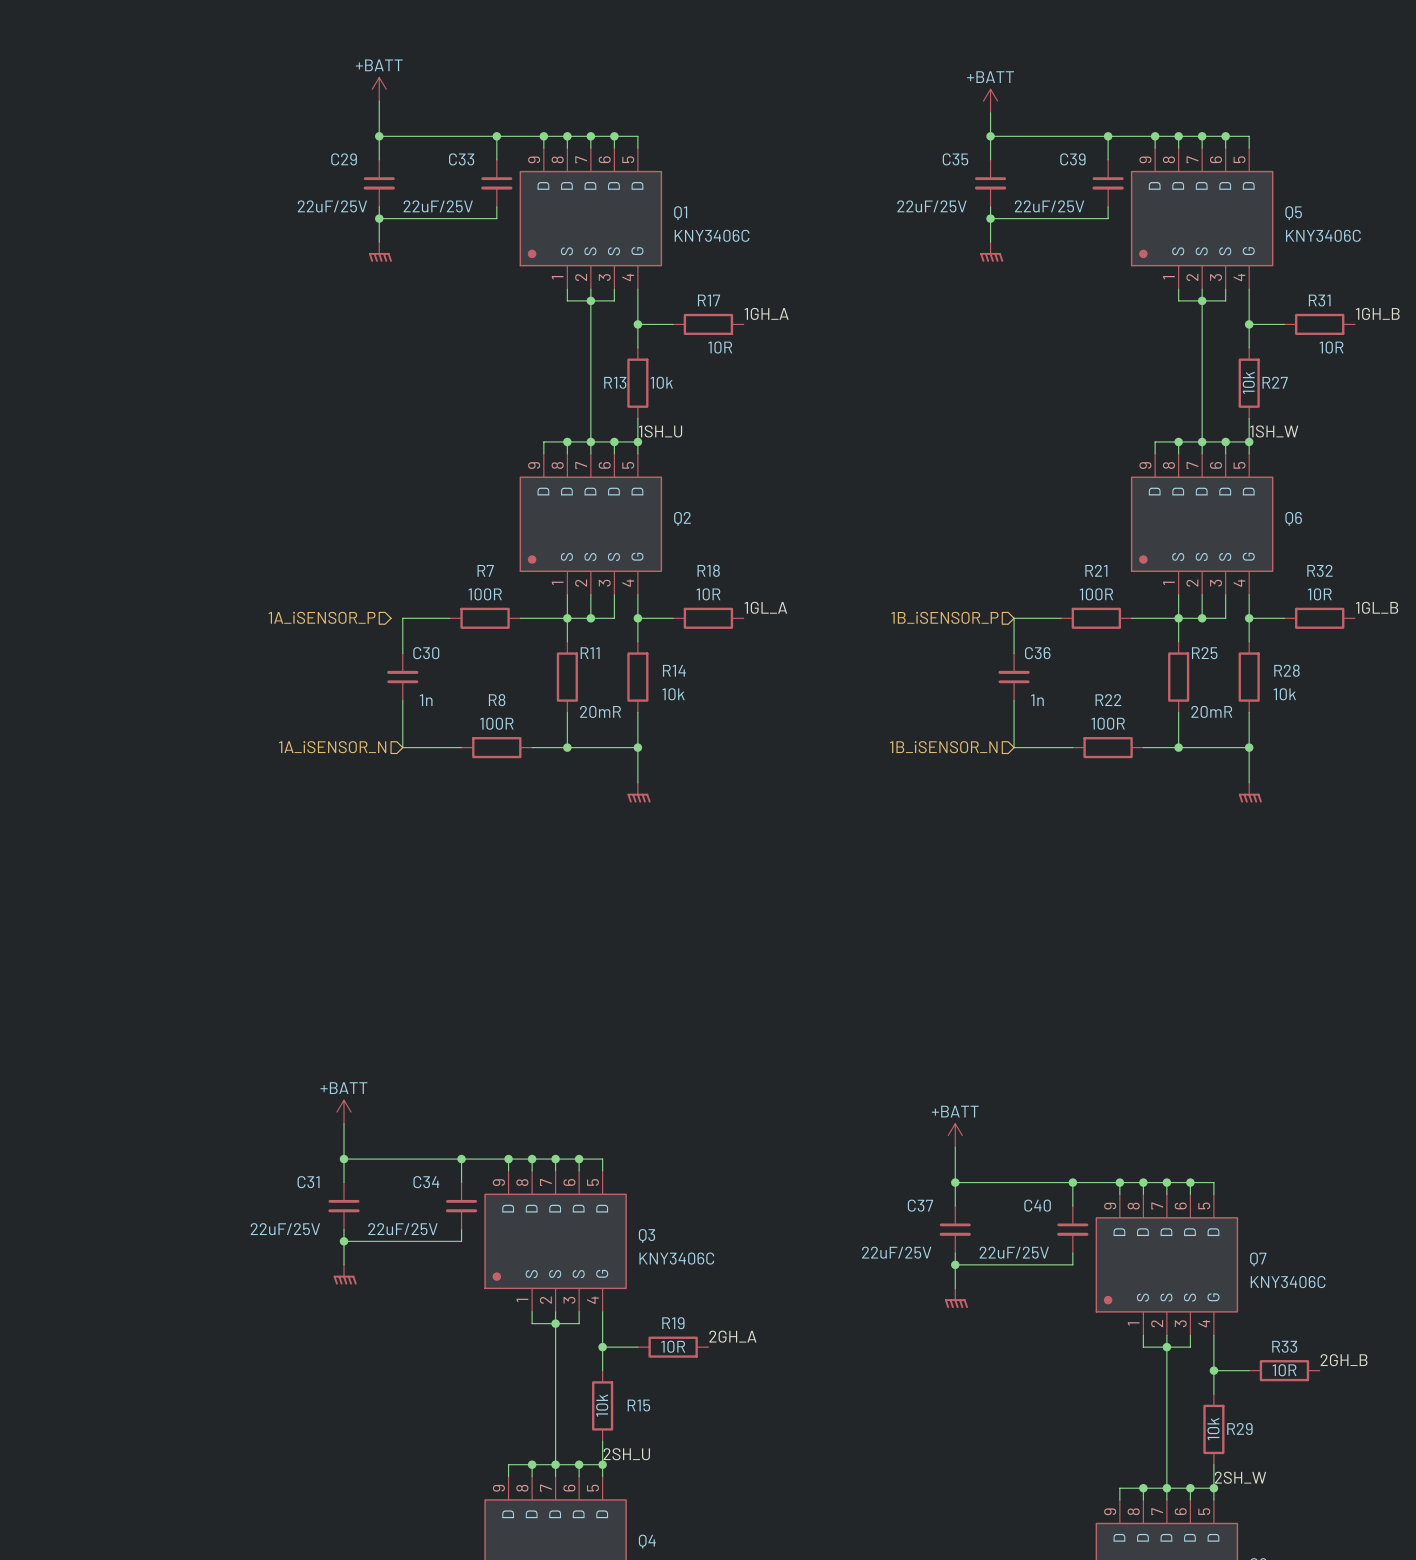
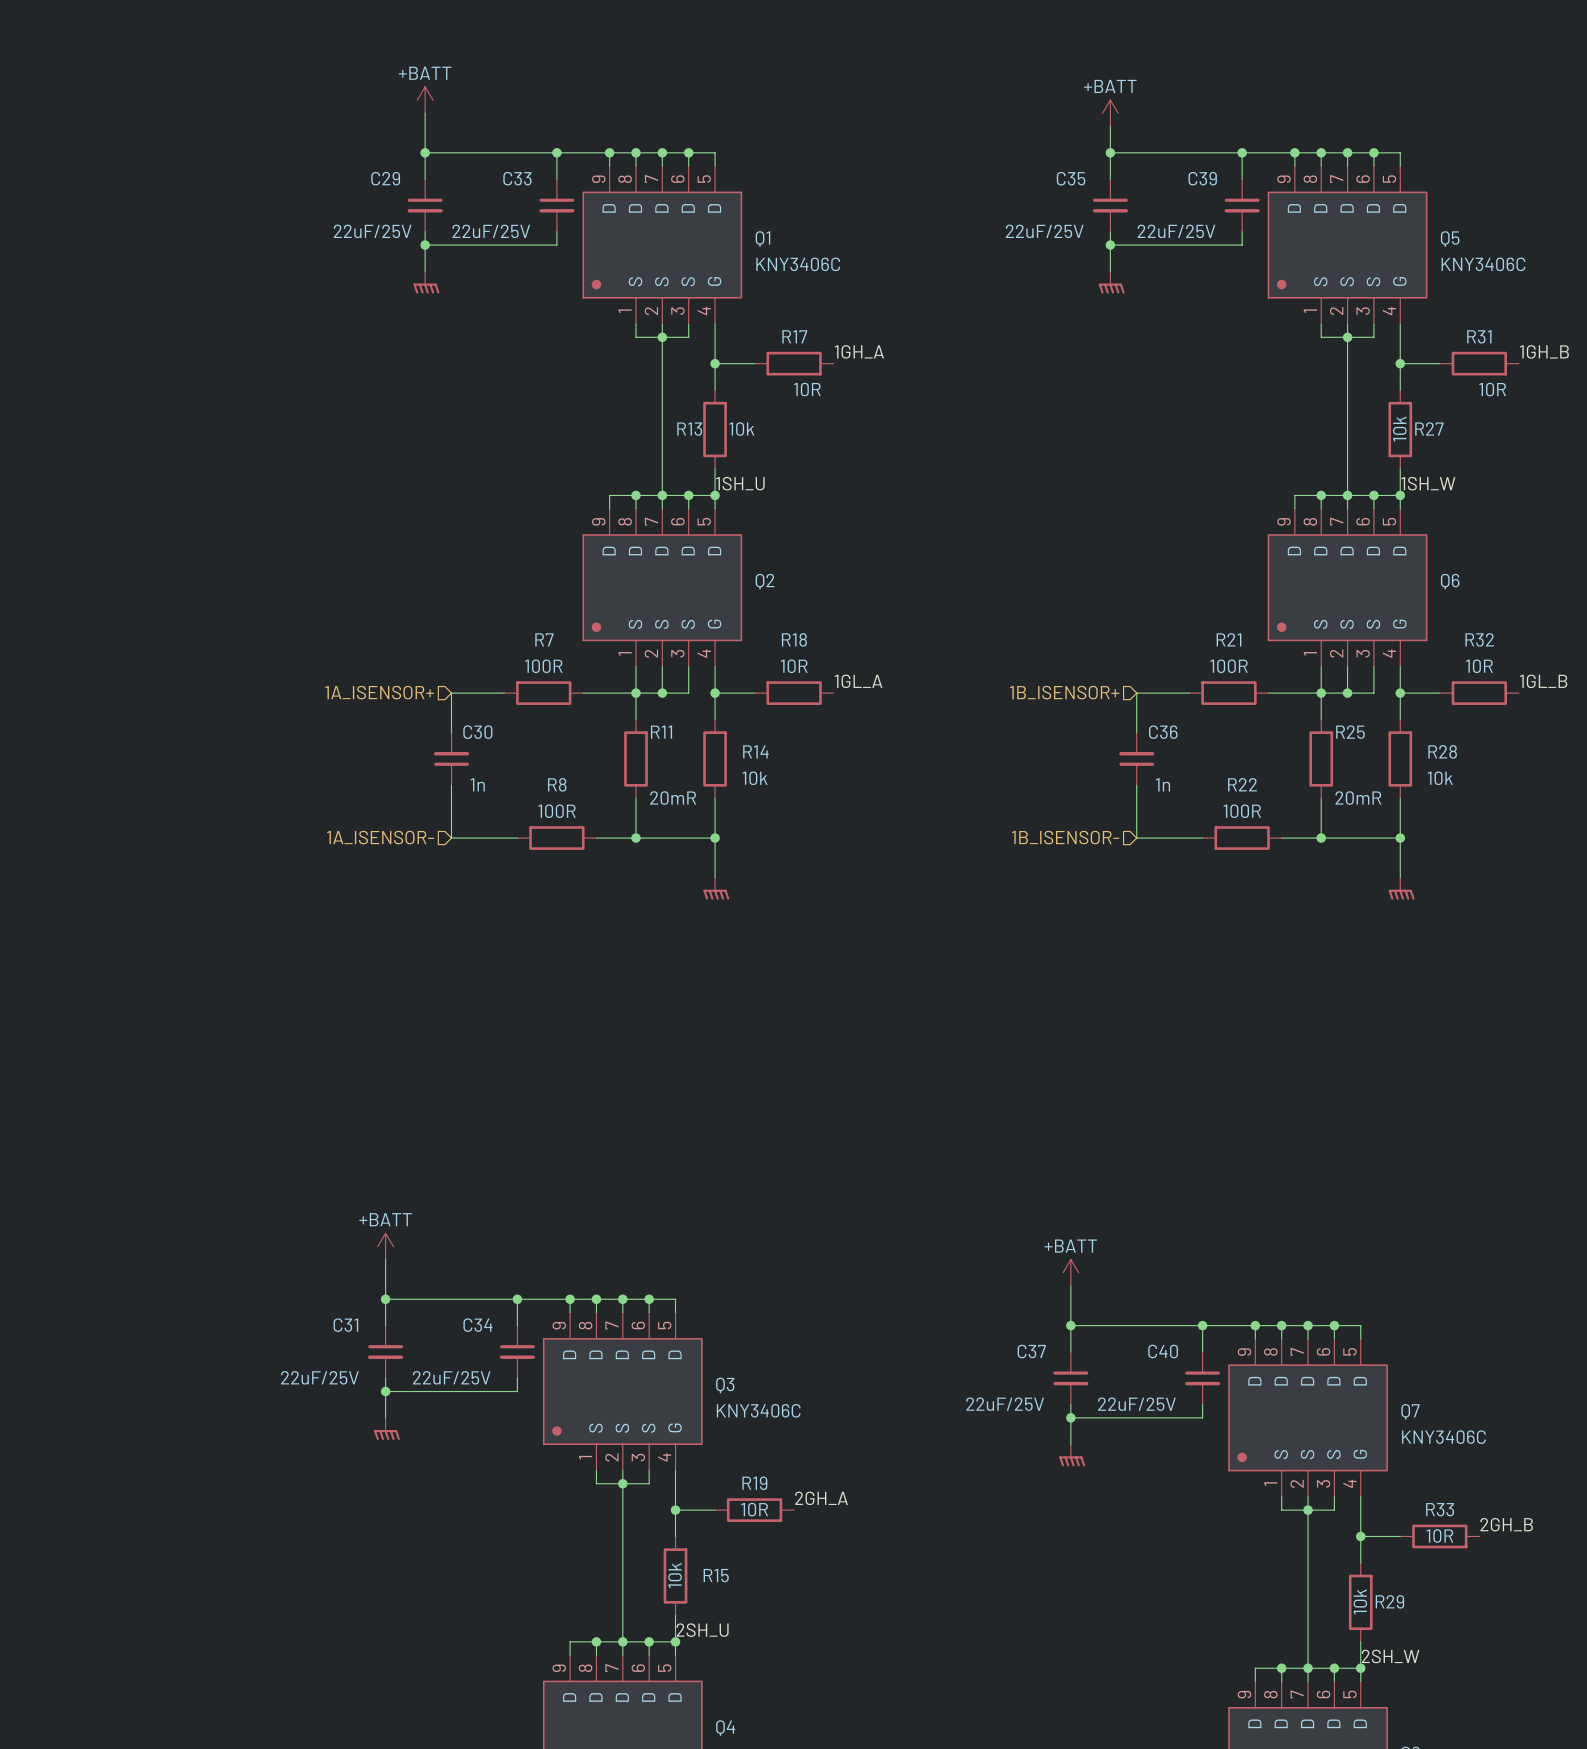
hierarchical label: 1A_iSENSOR_P (322, 617) -> 1A_ISENSOR+ (379, 692)
hierarchical label: 1B_iSENSOR_P (944, 617) -> 1B_ISENSOR+ (1064, 692)
hierarchical label: 1A_iSENSOR_N (332, 747) -> 1A_ISENSOR- (380, 837)
hierarchical label: 1B_iSENSOR_N (943, 747) -> 1B_ISENSOR- (1065, 837)

